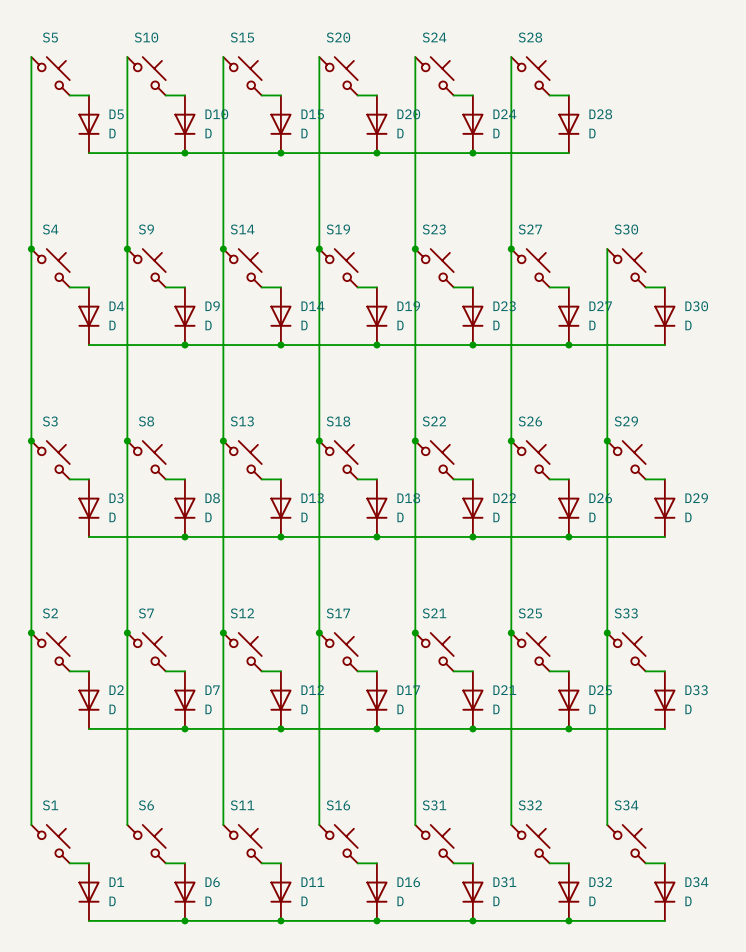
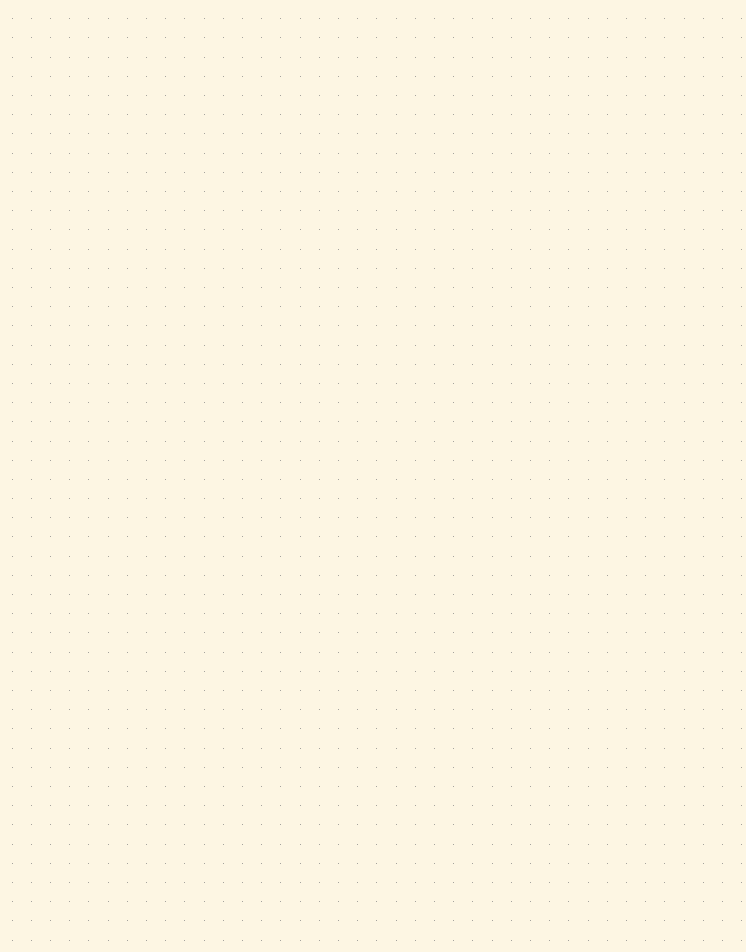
wire: (31, 57) (31, 824) -> none
wire: (127, 57) (127, 824) -> none
wire: (223, 57) (223, 824) -> none
wire: (319, 57) (319, 824) -> none
wire: (415, 57) (415, 824) -> none
wire: (511, 57) (511, 824) -> none
S5: (50, 76) -> none
S10: (146, 76) -> none
S15: (242, 76) -> none
S20: (338, 76) -> none
S24: (434, 76) -> none
S28: (530, 76) -> none
wire: (69, 95) (88, 95) -> none
wire: (165, 95) (184, 95) -> none
wire: (261, 95) (280, 95) -> none
wire: (357, 95) (376, 95) -> none
wire: (453, 95) (472, 95) -> none
wire: (549, 95) (568, 95) -> none
D5: D (88, 124) -> none
D10: D (184, 124) -> none
D15: D (280, 124) -> none
D20: D (376, 124) -> none
D24: D (472, 124) -> none
D28: D (568, 124) -> none
wire: (88, 153) (568, 153) -> none
junction: (184, 153) -> none
junction: (280, 153) -> none
junction: (376, 153) -> none
junction: (472, 153) -> none
junction: (31, 249) -> none
junction: (127, 249) -> none
junction: (223, 249) -> none
junction: (319, 249) -> none
junction: (415, 249) -> none
junction: (511, 249) -> none
wire: (607, 249) (607, 824) -> none
S4: (50, 268) -> none
S9: (146, 268) -> none
S14: (242, 268) -> none
S19: (338, 268) -> none
S23: (434, 268) -> none
S27: (530, 268) -> none
S30: (626, 268) -> none
wire: (69, 287) (88, 287) -> none
wire: (165, 287) (184, 287) -> none
wire: (261, 287) (280, 287) -> none
wire: (357, 287) (376, 287) -> none
wire: (453, 287) (472, 287) -> none
wire: (549, 287) (568, 287) -> none
wire: (645, 287) (664, 287) -> none
D4: D (88, 316) -> none
D9: D (184, 316) -> none
D14: D (280, 316) -> none
D19: D (376, 316) -> none
D23: D (472, 316) -> none
D27: D (568, 316) -> none
D30: D (664, 316) -> none
wire: (88, 345) (664, 345) -> none
junction: (184, 345) -> none
junction: (280, 345) -> none
junction: (376, 345) -> none
junction: (472, 345) -> none
junction: (568, 345) -> none
junction: (31, 441) -> none
junction: (127, 441) -> none
junction: (223, 441) -> none
junction: (319, 441) -> none
junction: (415, 441) -> none
junction: (511, 441) -> none
junction: (607, 441) -> none
S3: (50, 460) -> none
S8: (146, 460) -> none
S13: (242, 460) -> none
S18: (338, 460) -> none
S22: (434, 460) -> none
S26: (530, 460) -> none
S29: (626, 460) -> none
wire: (69, 479) (88, 479) -> none
wire: (165, 479) (184, 479) -> none
wire: (261, 479) (280, 479) -> none
wire: (357, 479) (376, 479) -> none
wire: (453, 479) (472, 479) -> none
wire: (549, 479) (568, 479) -> none
wire: (645, 479) (664, 479) -> none
D3: D (88, 508) -> none
D8: D (184, 508) -> none
D13: D (280, 508) -> none
D18: D (376, 508) -> none
D22: D (472, 508) -> none
D26: D (568, 508) -> none
D29: D (664, 508) -> none
wire: (88, 536) (664, 536) -> none
junction: (184, 536) -> none
junction: (280, 536) -> none
junction: (376, 536) -> none
junction: (472, 536) -> none
junction: (568, 536) -> none
junction: (31, 632) -> none
junction: (127, 632) -> none
junction: (223, 632) -> none
junction: (319, 632) -> none
junction: (415, 632) -> none
junction: (511, 632) -> none
junction: (607, 632) -> none
S2: (50, 652) -> none
S7: (146, 652) -> none
S12: (242, 652) -> none
S17: (338, 652) -> none
S21: (434, 652) -> none
S25: (530, 652) -> none
S33: (626, 652) -> none
wire: (69, 671) (88, 671) -> none
wire: (165, 671) (184, 671) -> none
wire: (261, 671) (280, 671) -> none
wire: (357, 671) (376, 671) -> none
wire: (453, 671) (472, 671) -> none
wire: (549, 671) (568, 671) -> none
wire: (645, 671) (664, 671) -> none
D2: D (88, 700) -> none
D7: D (184, 700) -> none
D12: D (280, 700) -> none
D17: D (376, 700) -> none
D21: D (472, 700) -> none
D25: D (568, 700) -> none
D33: D (664, 700) -> none
wire: (88, 728) (664, 728) -> none
junction: (184, 728) -> none
junction: (280, 728) -> none
junction: (376, 728) -> none
junction: (472, 728) -> none
junction: (568, 728) -> none
S1: (50, 844) -> none
S6: (146, 844) -> none
S11: (242, 844) -> none
S16: (338, 844) -> none
S31: (434, 844) -> none
S32: (530, 844) -> none
S34: (626, 844) -> none
wire: (69, 863) (88, 863) -> none
wire: (165, 863) (184, 863) -> none
wire: (261, 863) (280, 863) -> none
wire: (357, 863) (376, 863) -> none
wire: (453, 863) (472, 863) -> none
wire: (549, 863) (568, 863) -> none
wire: (645, 863) (664, 863) -> none
D1: D (88, 892) -> none
D6: D (184, 892) -> none
D11: D (280, 892) -> none
D16: D (376, 892) -> none
D31: D (472, 892) -> none
D32: D (568, 892) -> none
D34: D (664, 892) -> none
wire: (88, 920) (664, 920) -> none
junction: (184, 920) -> none
junction: (280, 920) -> none
junction: (376, 920) -> none
junction: (472, 920) -> none
junction: (568, 920) -> none

